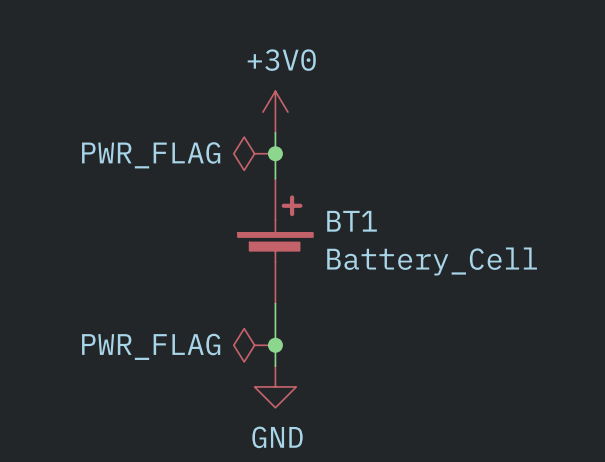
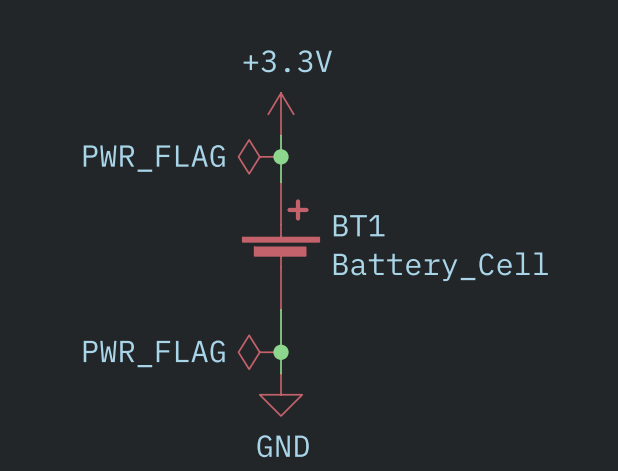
power symbol: +3V0 (275, 112) -> +3.3V (281, 114)

